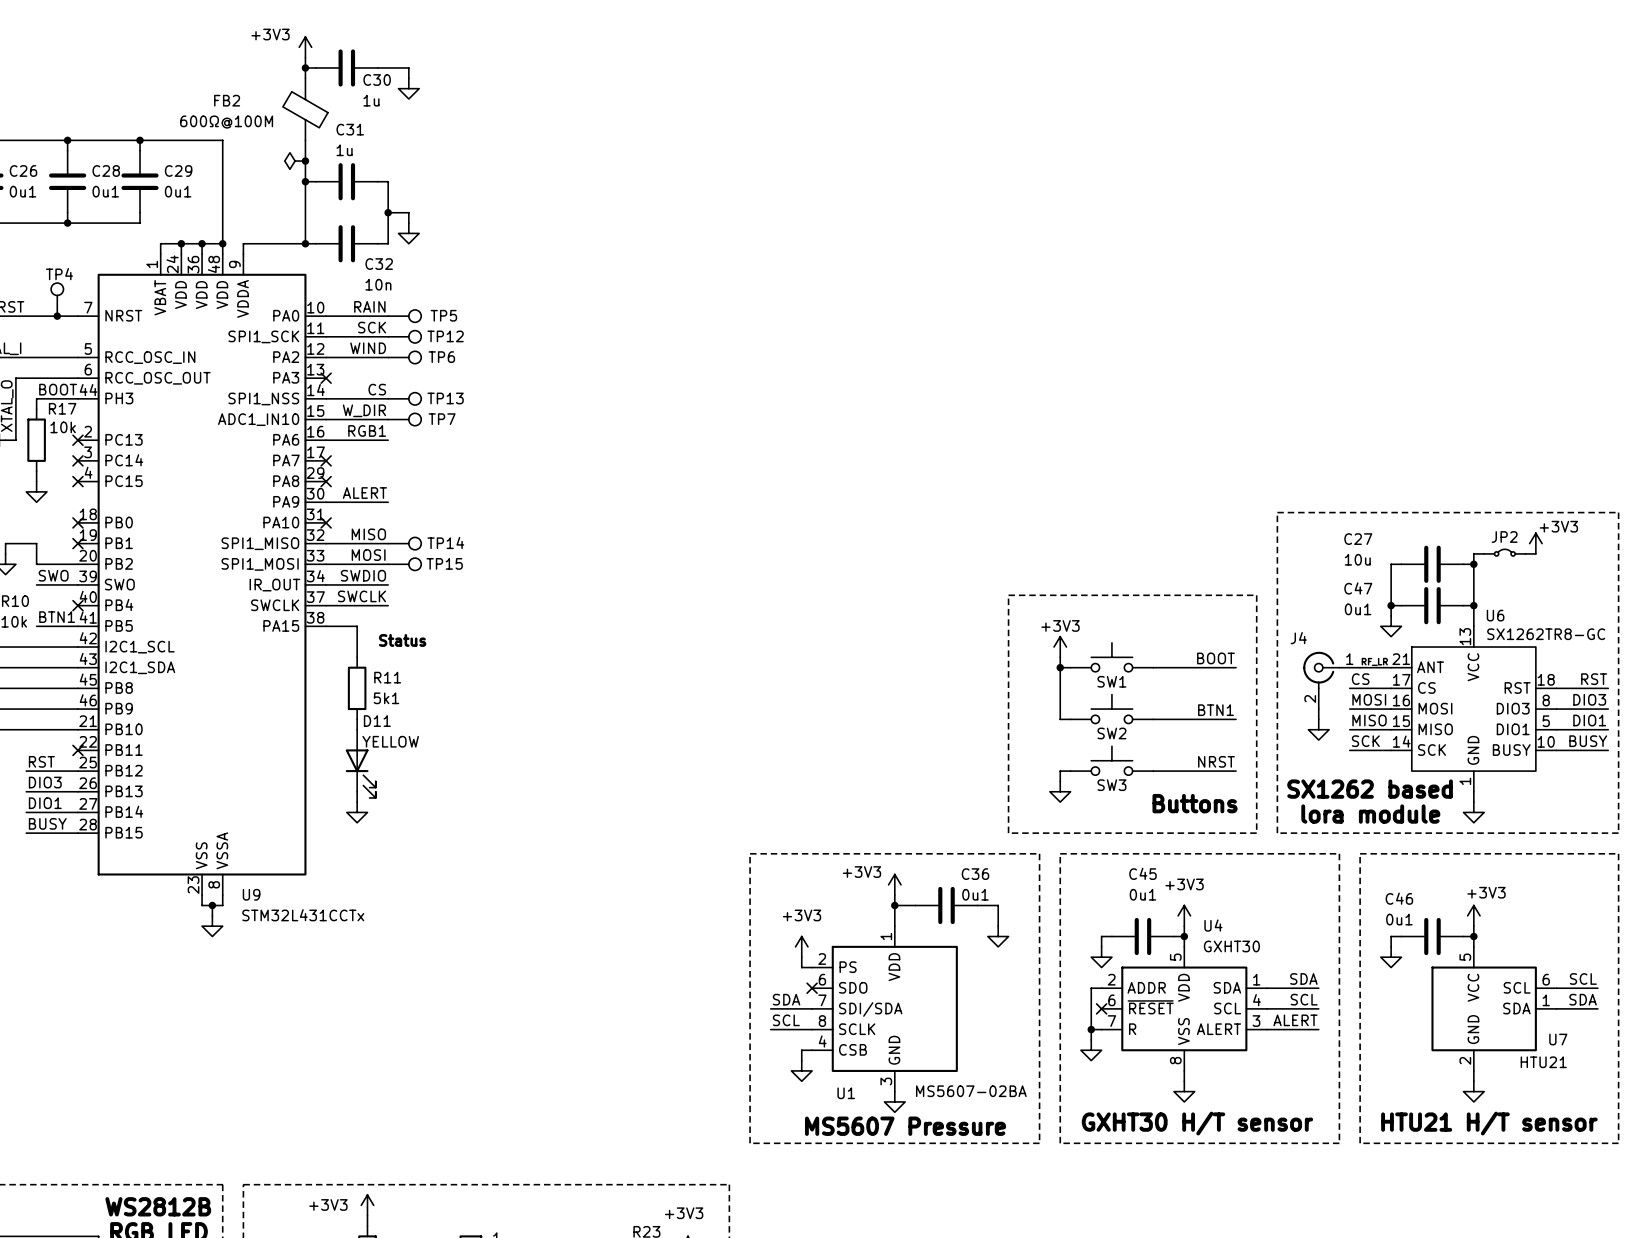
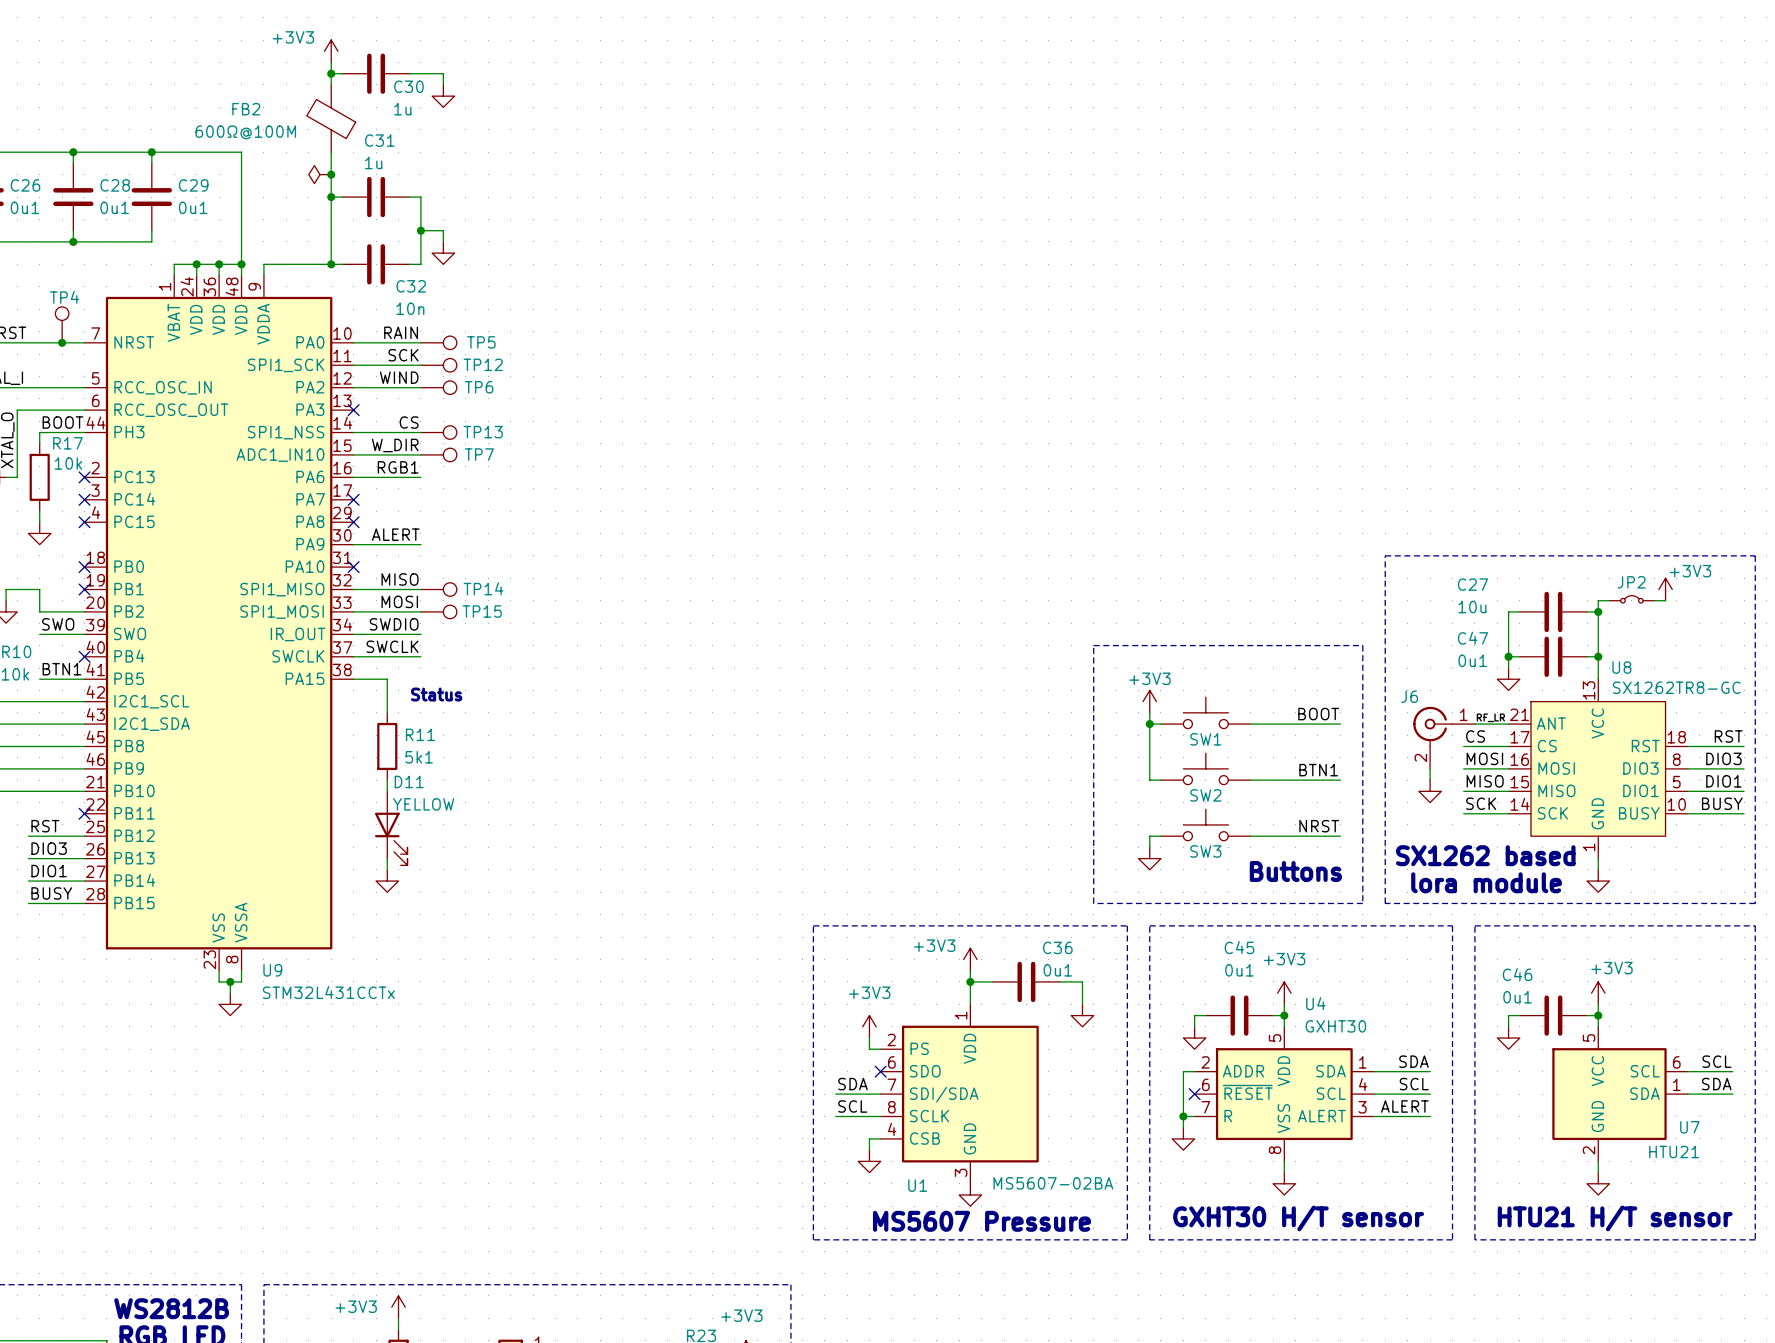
U6 name: U6 (1495, 615) -> U8 (1621, 667)
J4 name: J4 (1298, 638) -> J6 (1409, 696)

